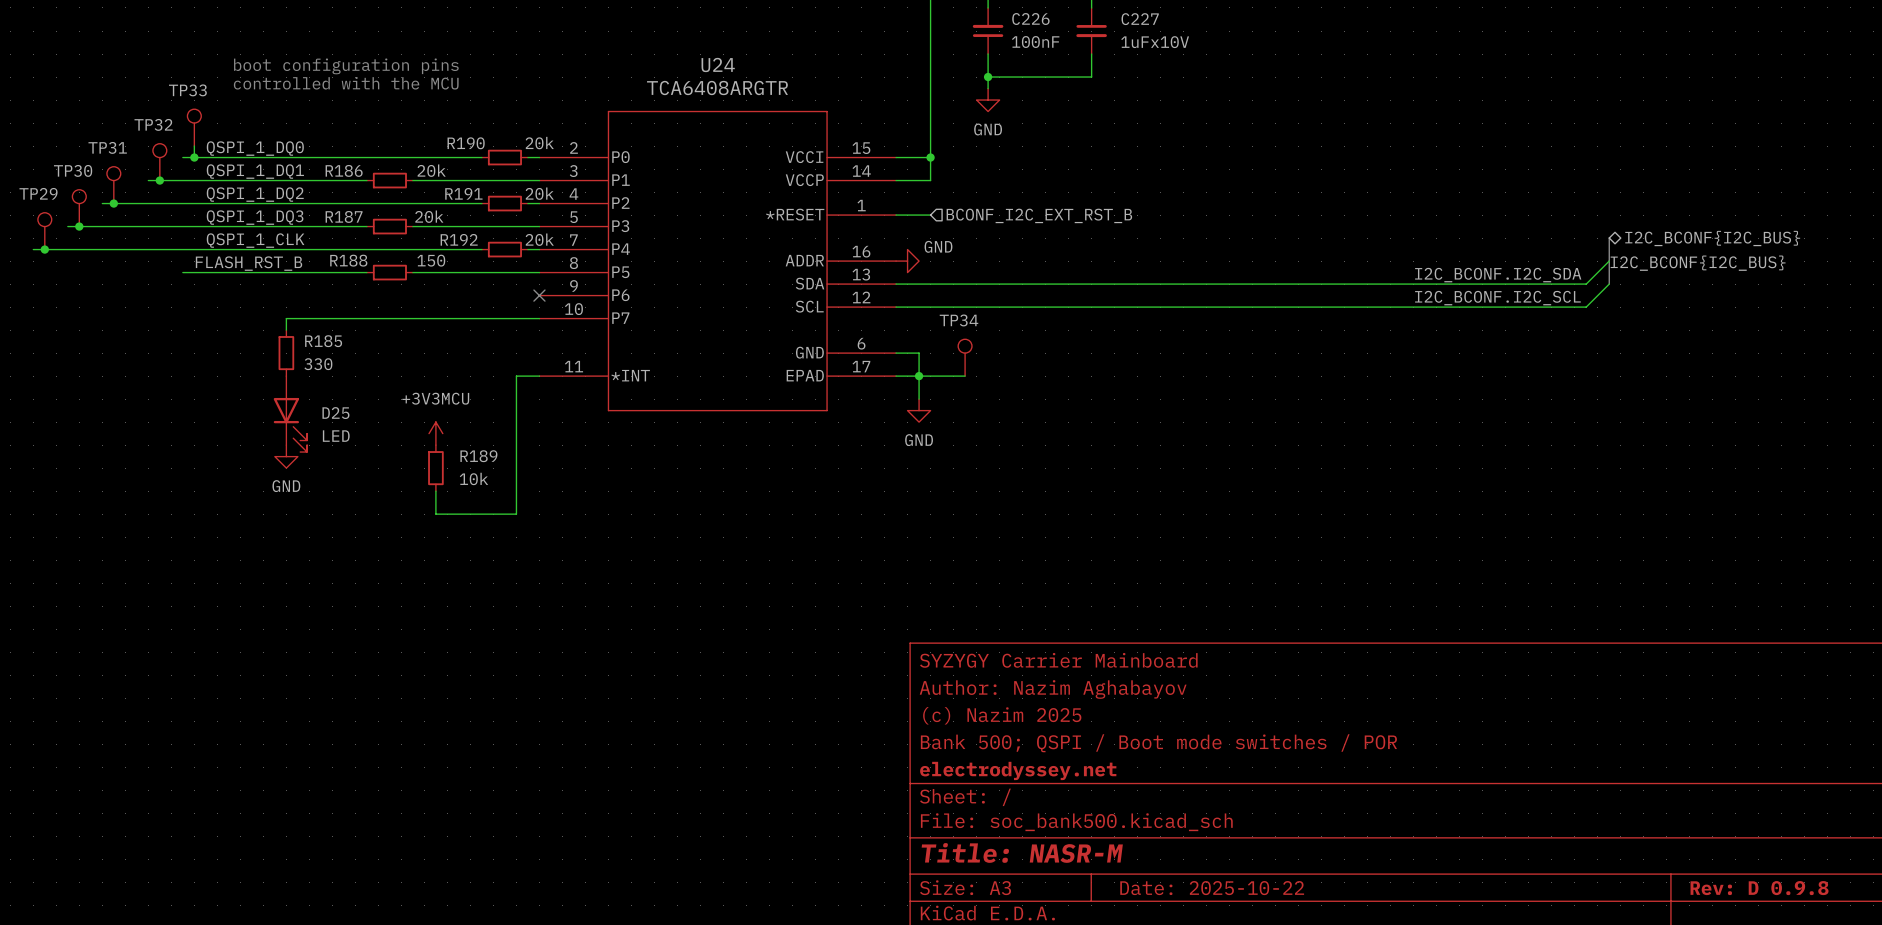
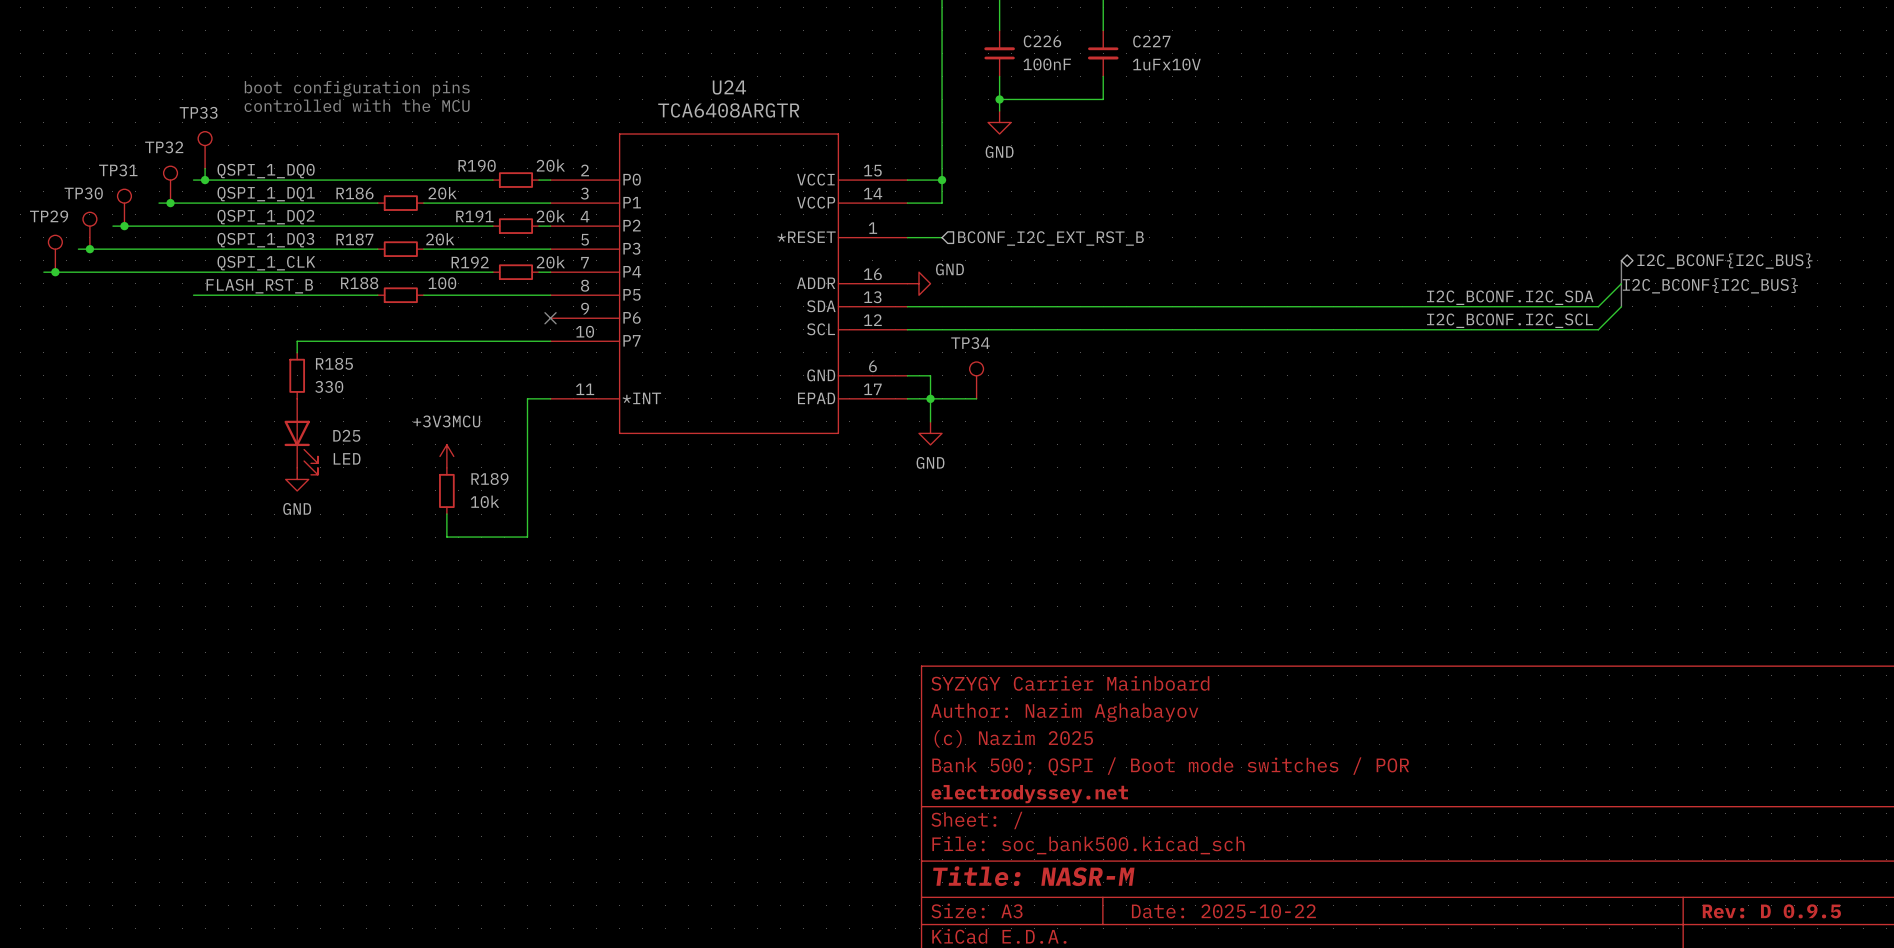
R188 value: 150 (431, 260) -> 100 (442, 283)
title block: Rev: D 0.9.8 (1759, 888) -> Rev: D 0.9.5 (1771, 911)

